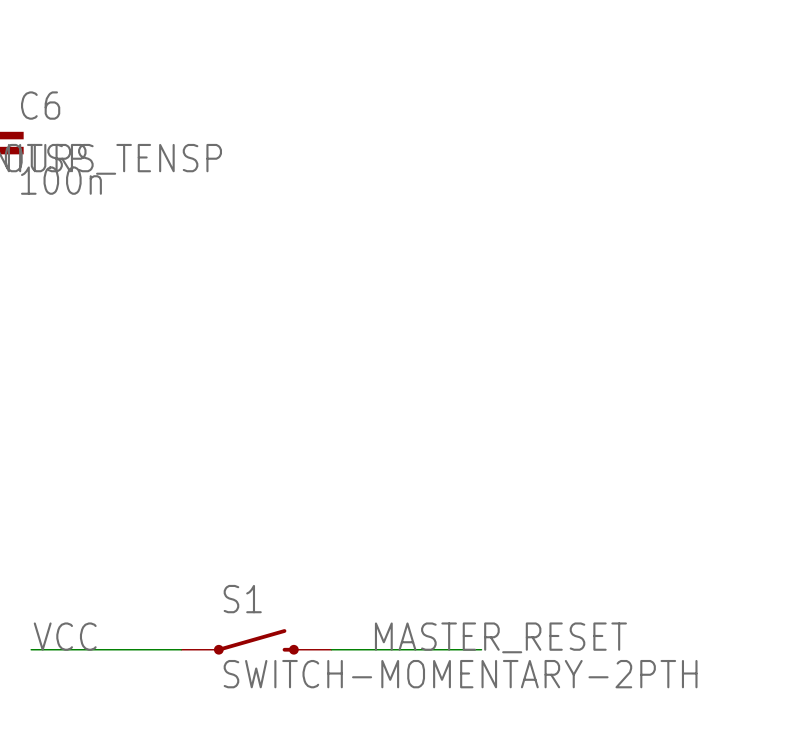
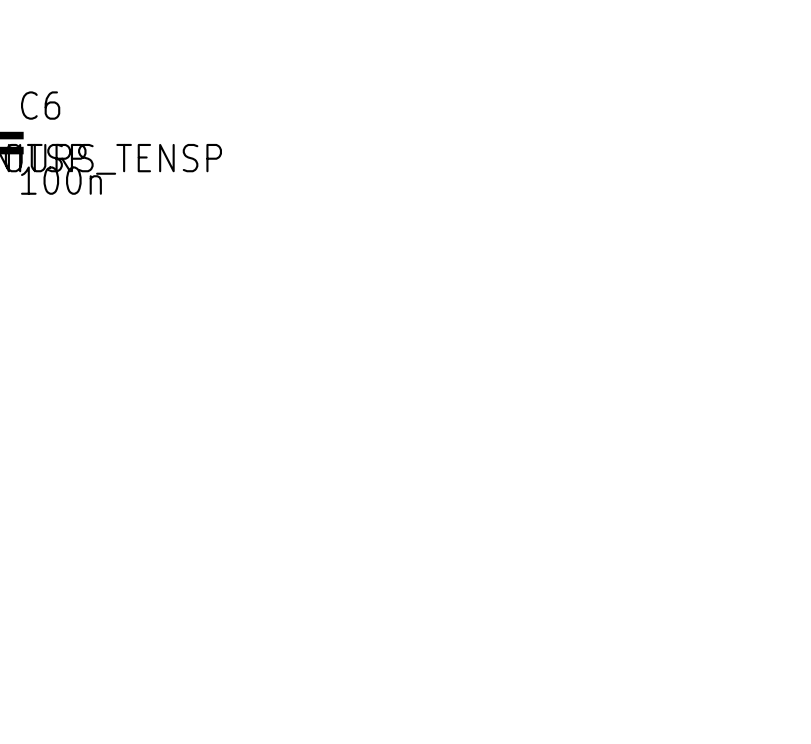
label: VCC (65, 636) -> none
label: MASTER_RESET (500, 637) -> none
S1: SWITCH-MOMENTARY-2PTH (256, 641) -> none
wire: (31, 649) (181, 649) -> none
wire: (331, 649) (481, 649) -> none

